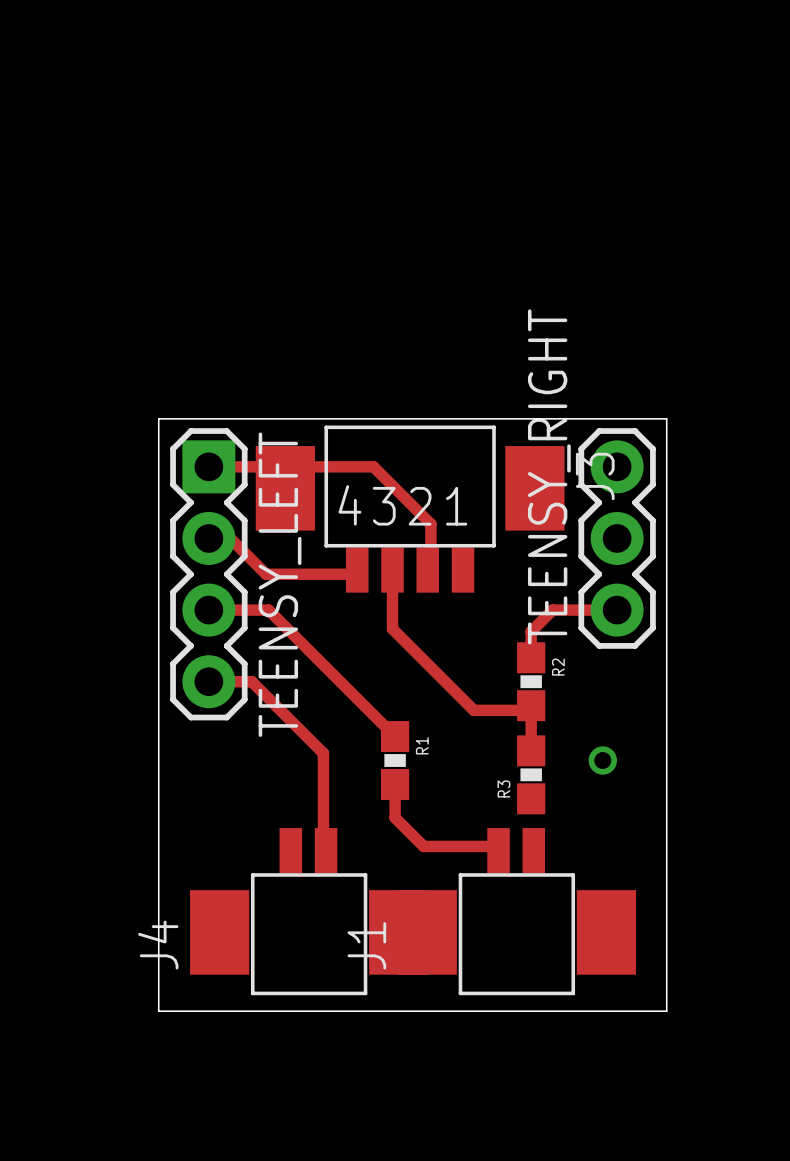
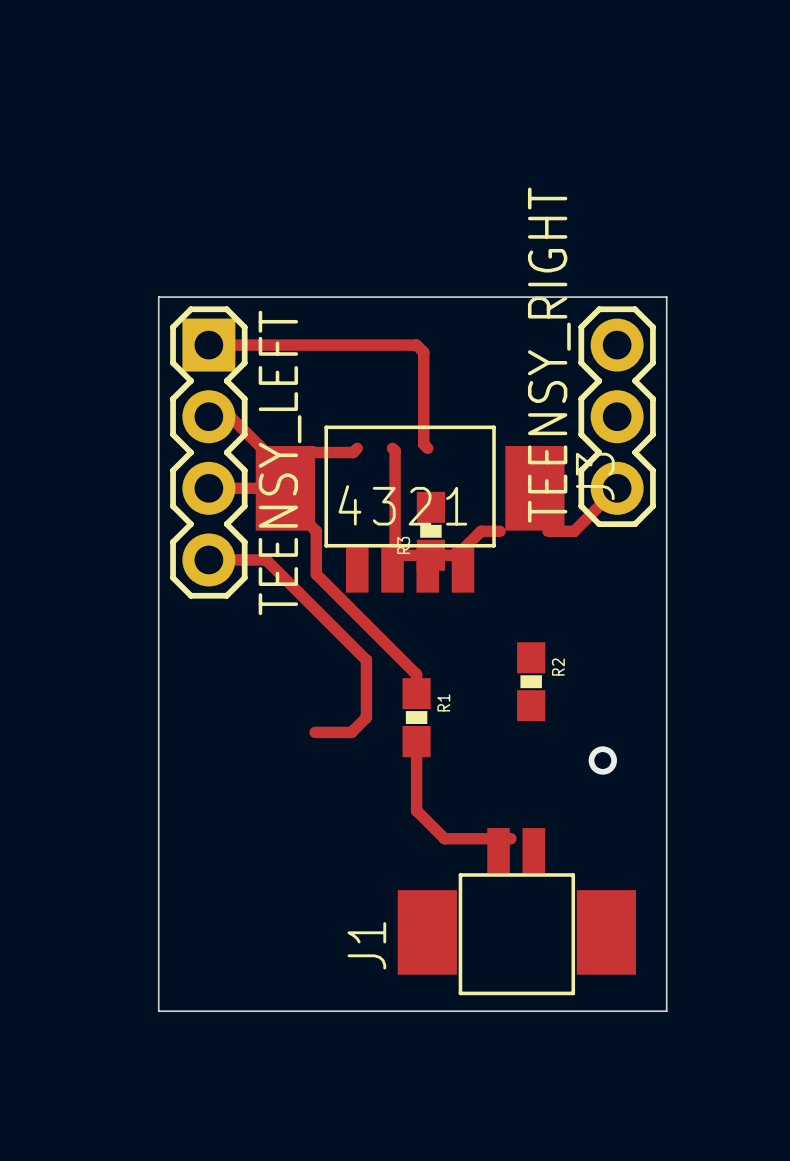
track: none -> (208, 345) (416, 345) (423, 352) (423, 444) (427, 448)
track: none -> (208, 416) (230, 416) (266, 452) (353, 452) (357, 448)
board edge: (158, 418) (666, 418) -> (158, 418) (158, 297) (666, 297) (666, 418)
track: none -> (392, 448) (395, 450) (395, 545) (404, 555) (457, 555) (481, 531) (500, 531)
track: (208, 466) (373, 466) (430, 524) (430, 566) (427, 570) -> none
track: none -> (208, 488) (273, 488) (316, 531) (316, 574) (416, 674) (416, 693)
track: none -> (617, 488) (574, 531) (547, 531)
track: (208, 538) (230, 538) (266, 574) (354, 574) (357, 570) -> none
TEENSY_RIGHT position: (617, 538) -> (617, 416)
track: none -> (208, 559) (266, 559) (366, 660) (366, 717) (351, 732) (315, 732)
track: (392, 570) (392, 628) (473, 710) (526, 710) (531, 705) (531, 750) -> none
TEENSY_LEFT position: (208, 574) -> (208, 452)
track: (208, 610) (268, 610) (395, 736) -> none
track: (617, 610) (552, 610) (531, 631) (531, 657) -> none
track: (208, 681) (251, 681) (323, 753) (323, 848) (326, 850) -> none
track: none -> (416, 741) (416, 810) (444, 838) (510, 838)
R1 position: (395, 760) -> (416, 717)
R3 position: (531, 774) -> (430, 531)
track: (395, 784) (395, 817) (423, 846) (494, 846) (498, 850) -> none
J4: (309, 911) -> none

